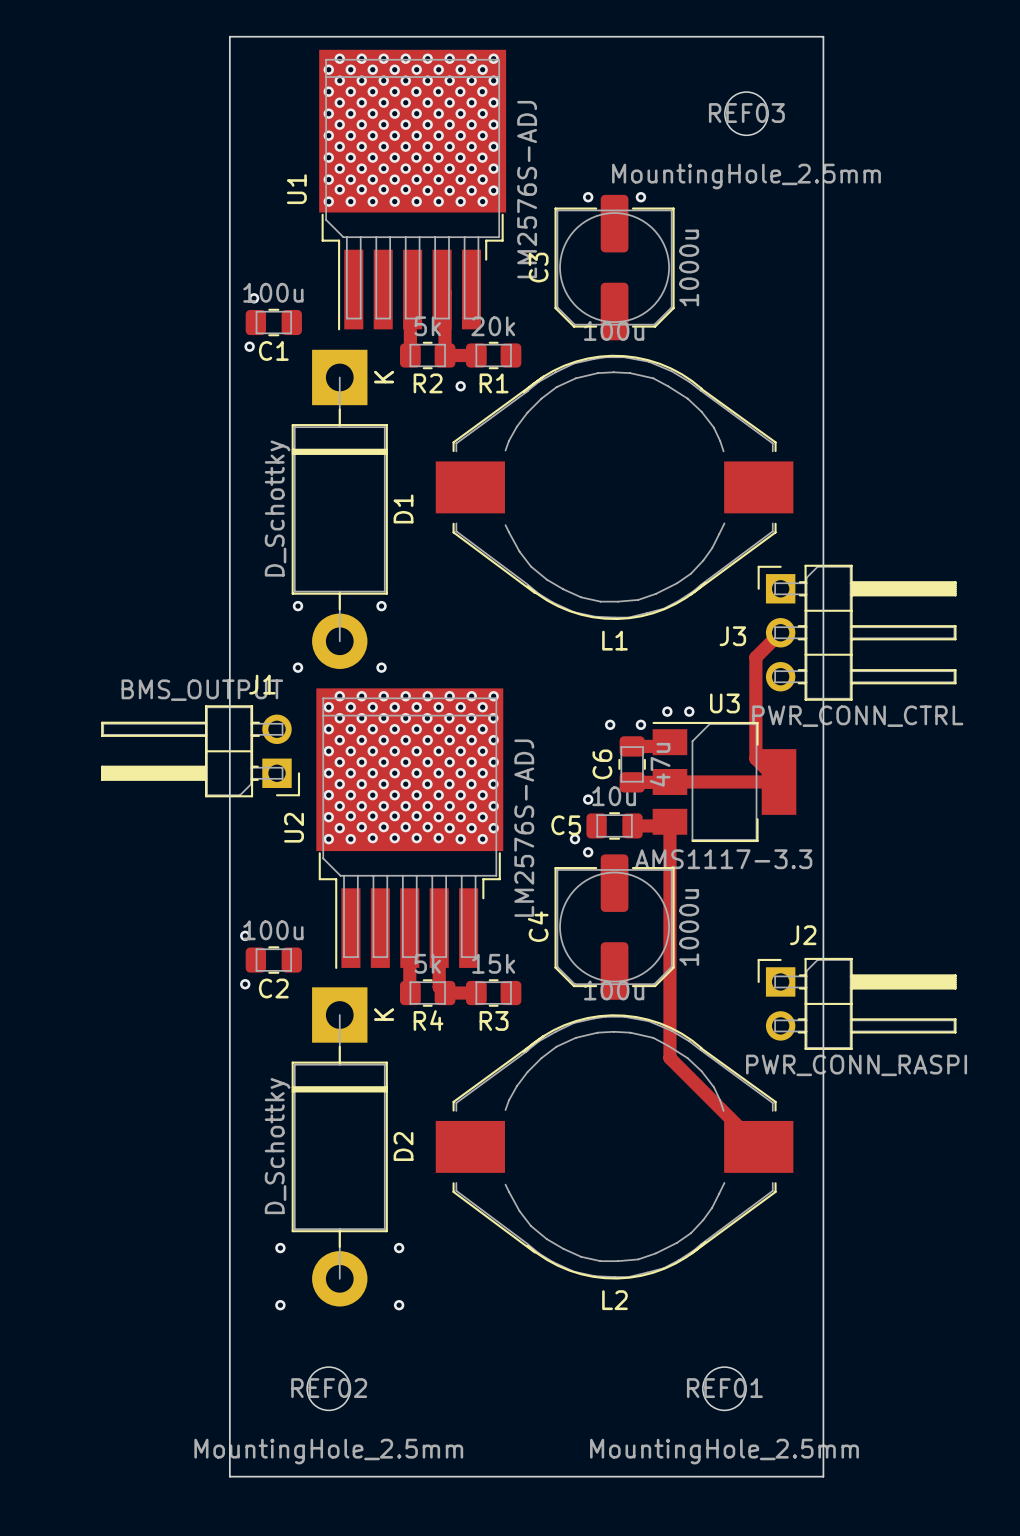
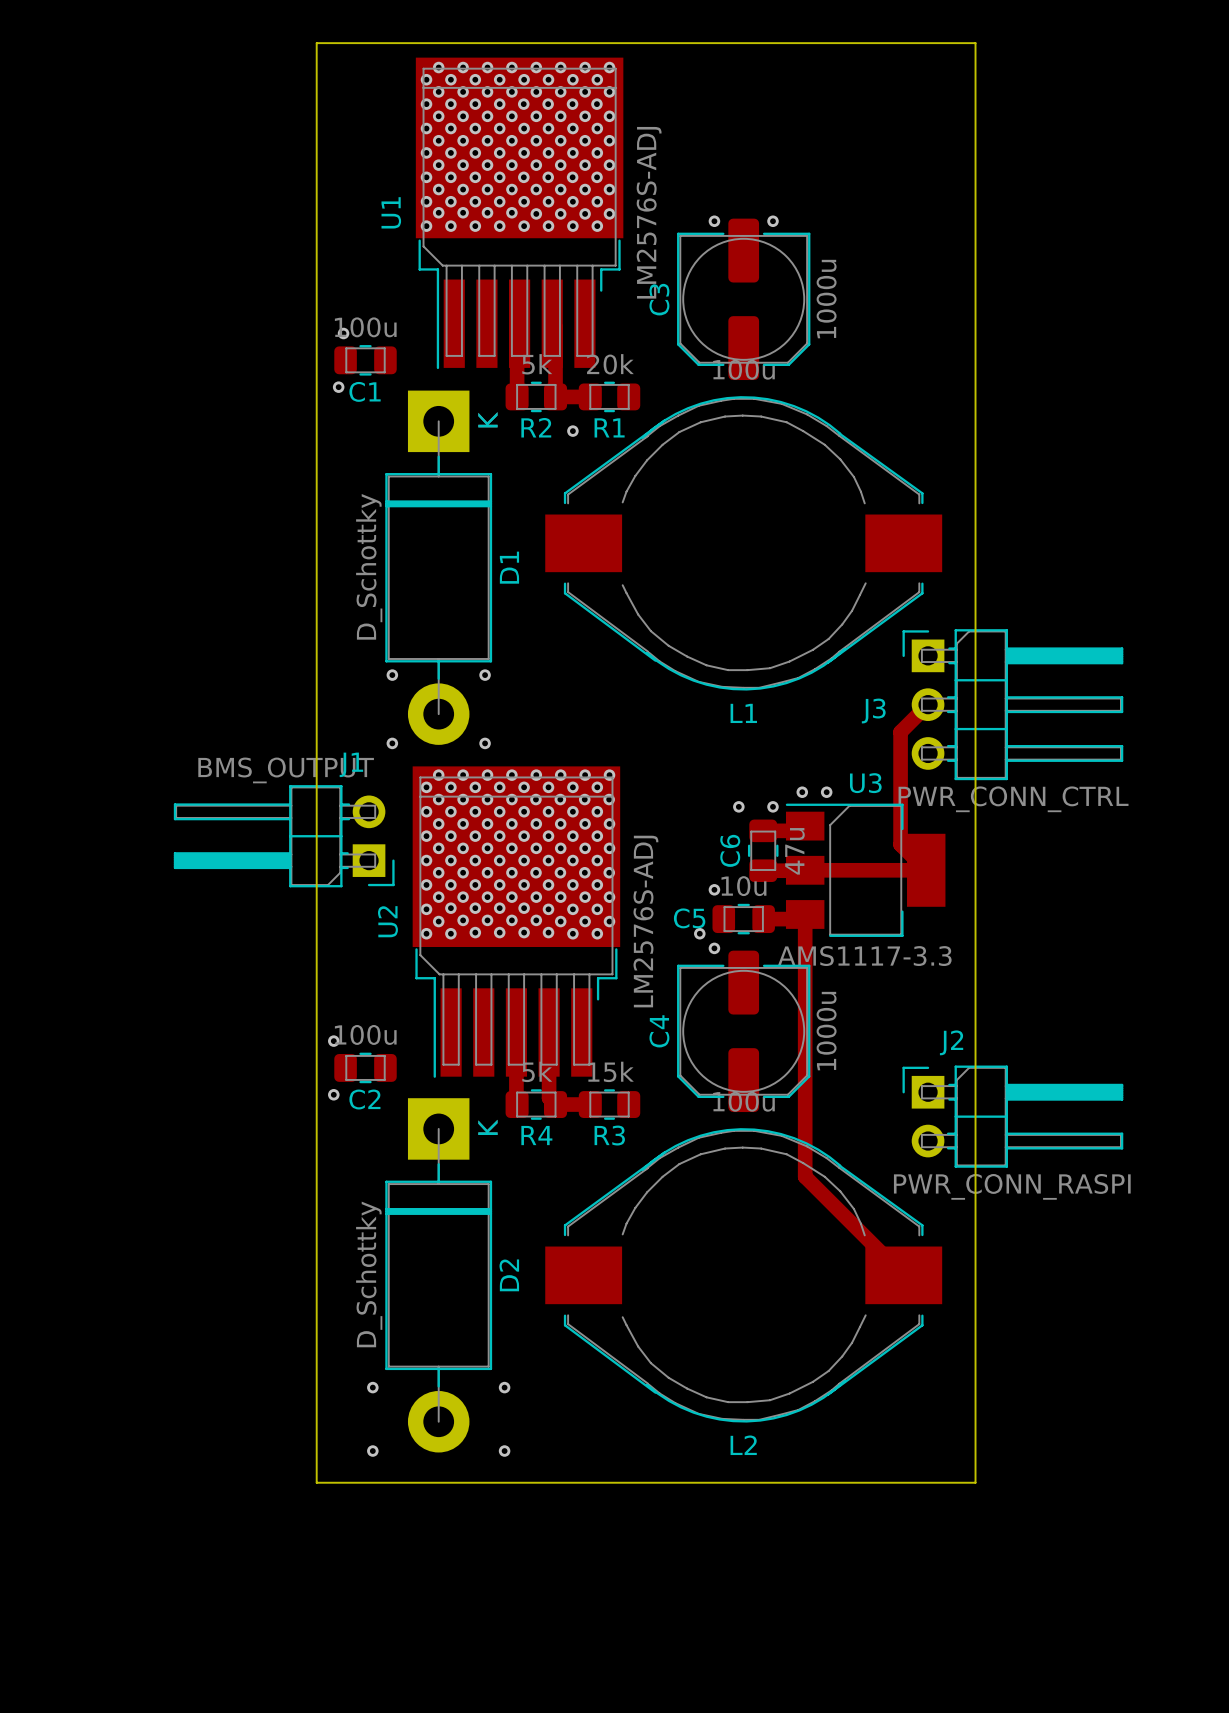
REF03: MountingHole_2.5mm (746, 113) -> none
board edge: (229, 1333) (229, 1476) (823, 1476) (823, 1333) -> (316, 1482) (975, 1482)
REF02: MountingHole_2.5mm (328, 1388) -> none
REF01: MountingHole_2.5mm (724, 1388) -> none

